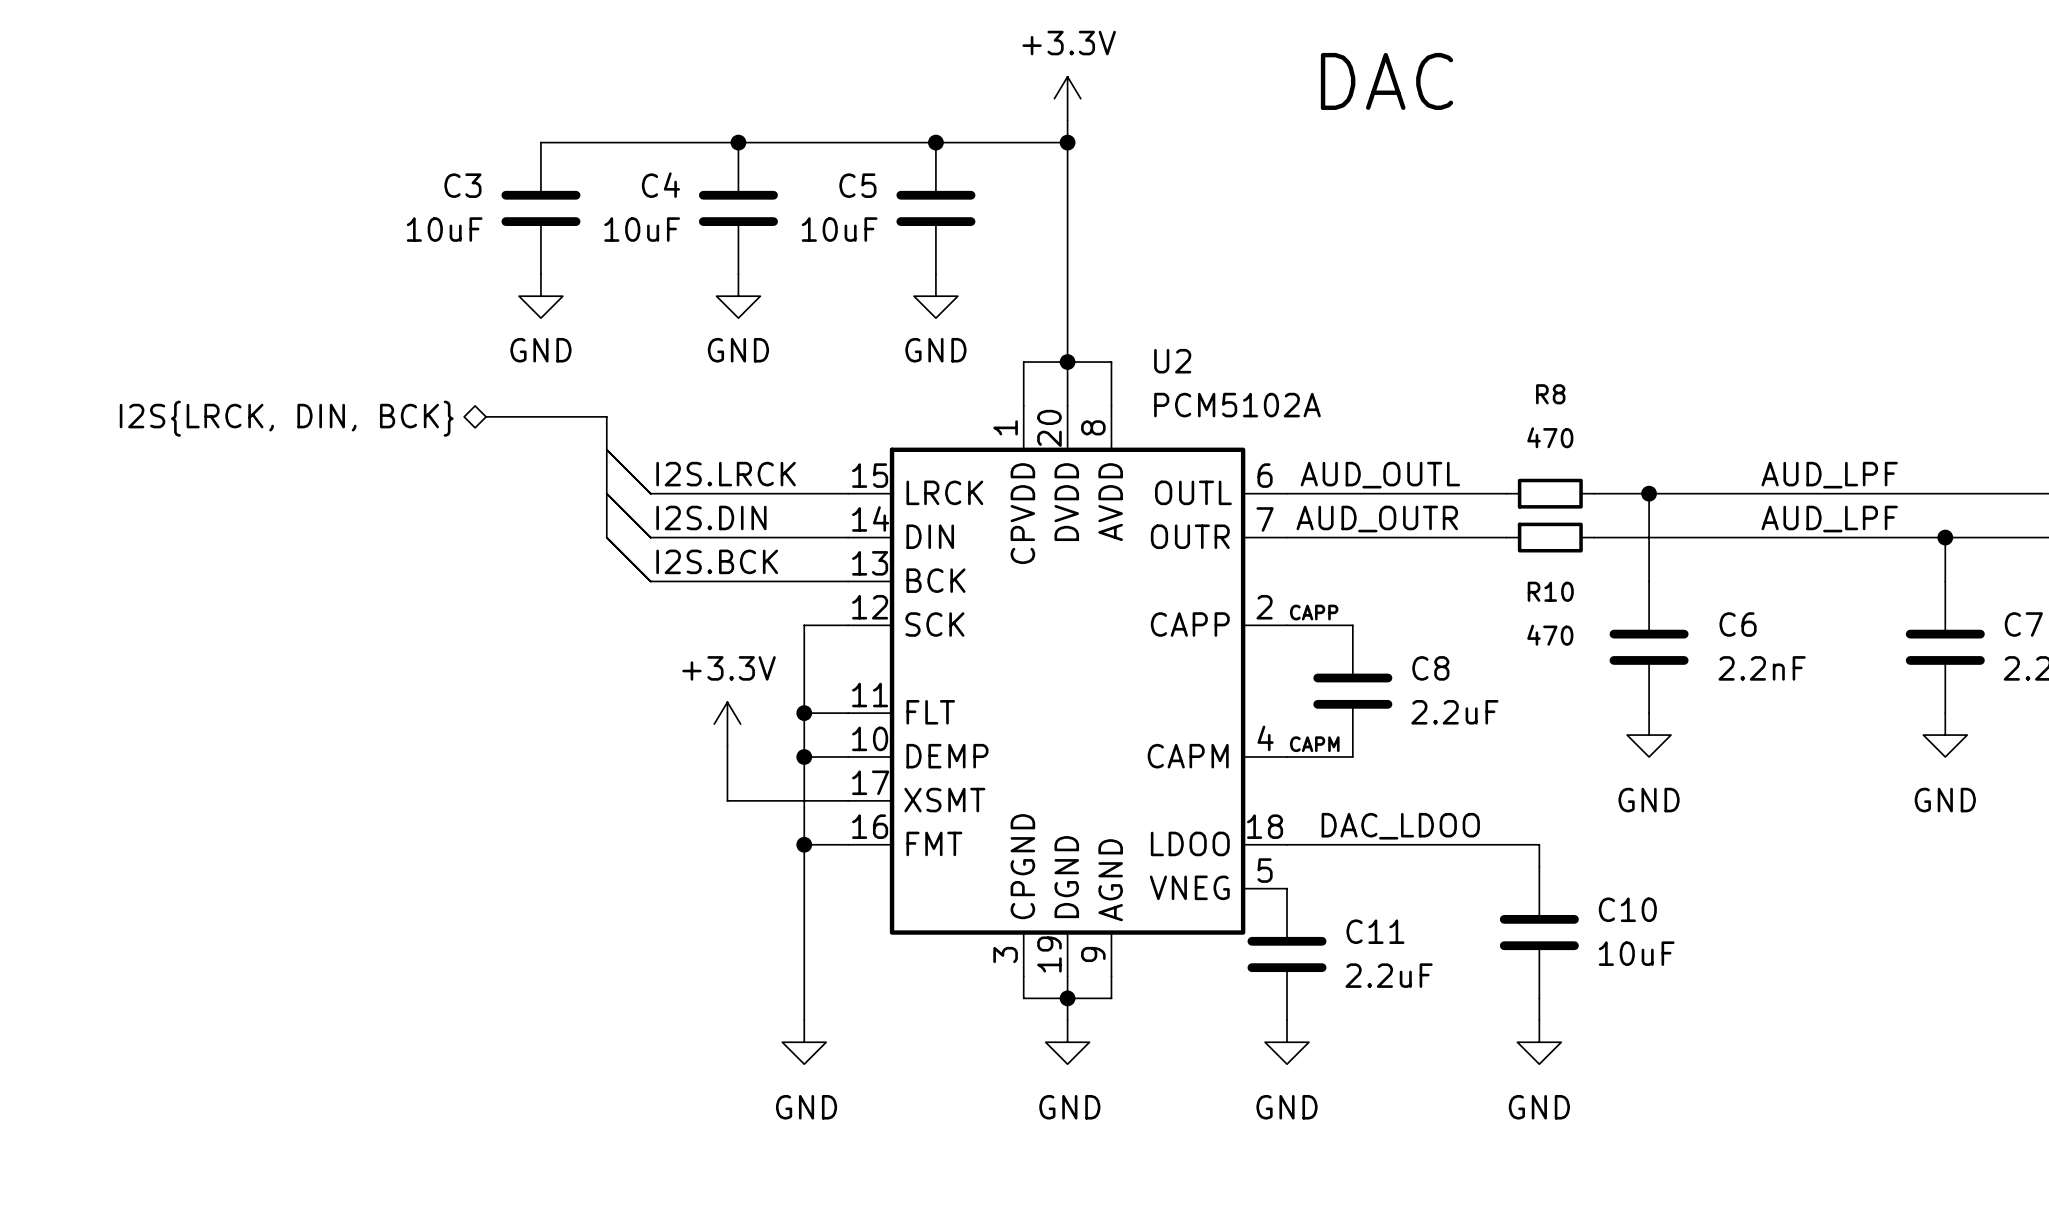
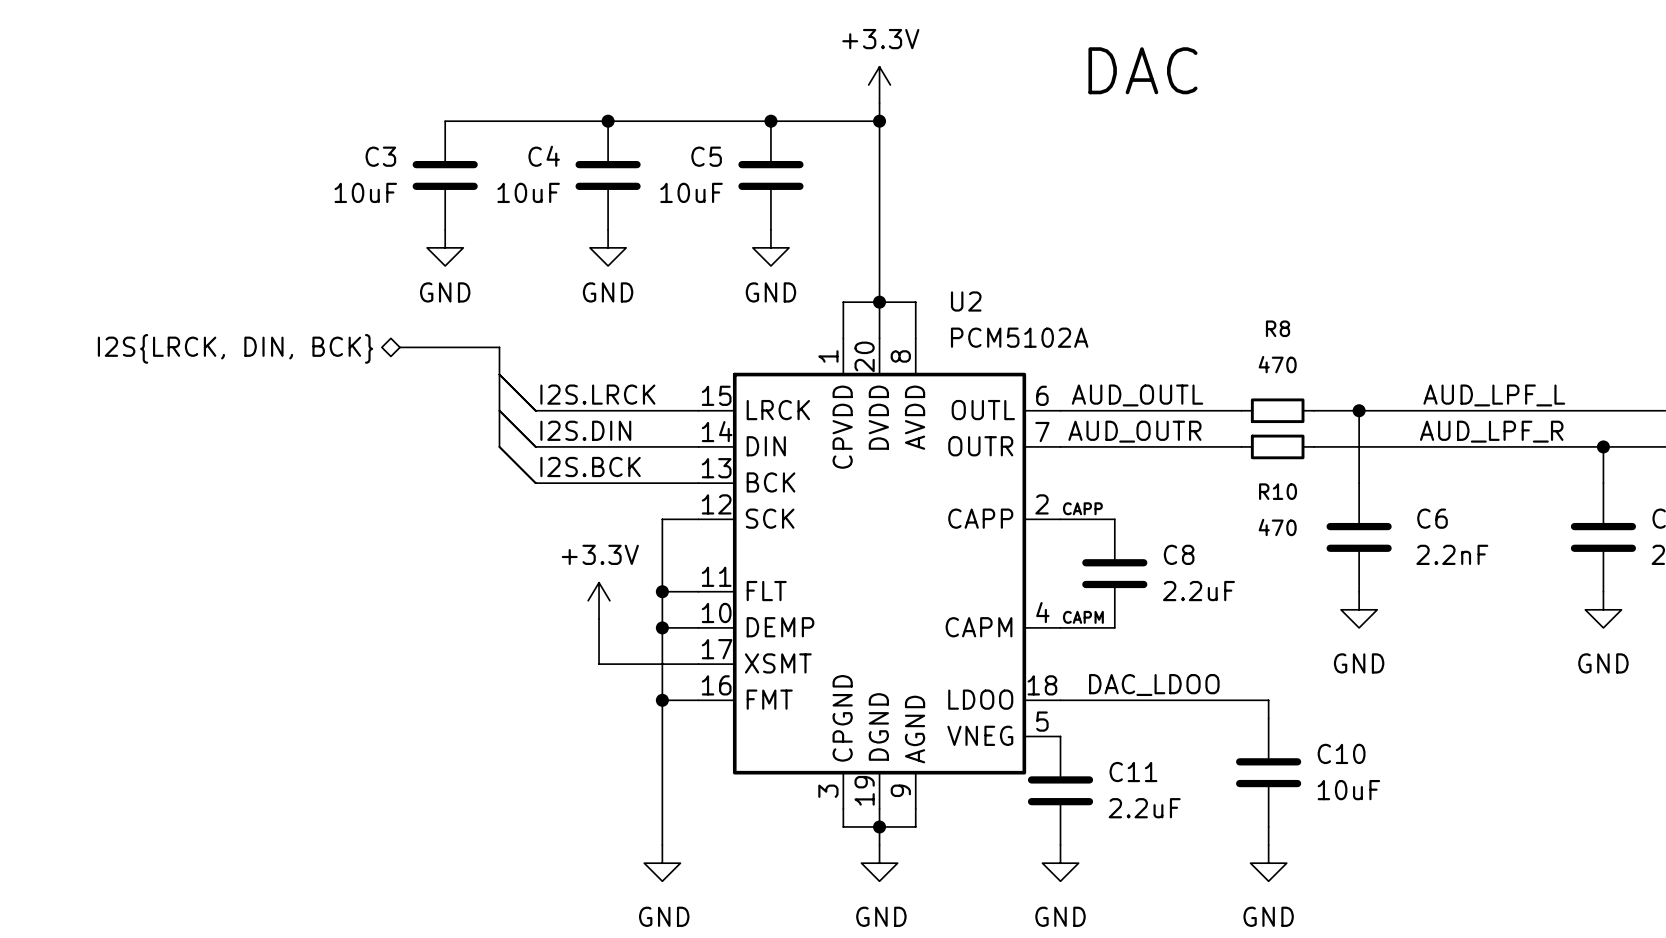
label: AUD_LPF (1829, 475) -> AUD_LPF_L (1494, 395)
label: AUD_LPF (1829, 519) -> AUD_LPF_R (1491, 431)

